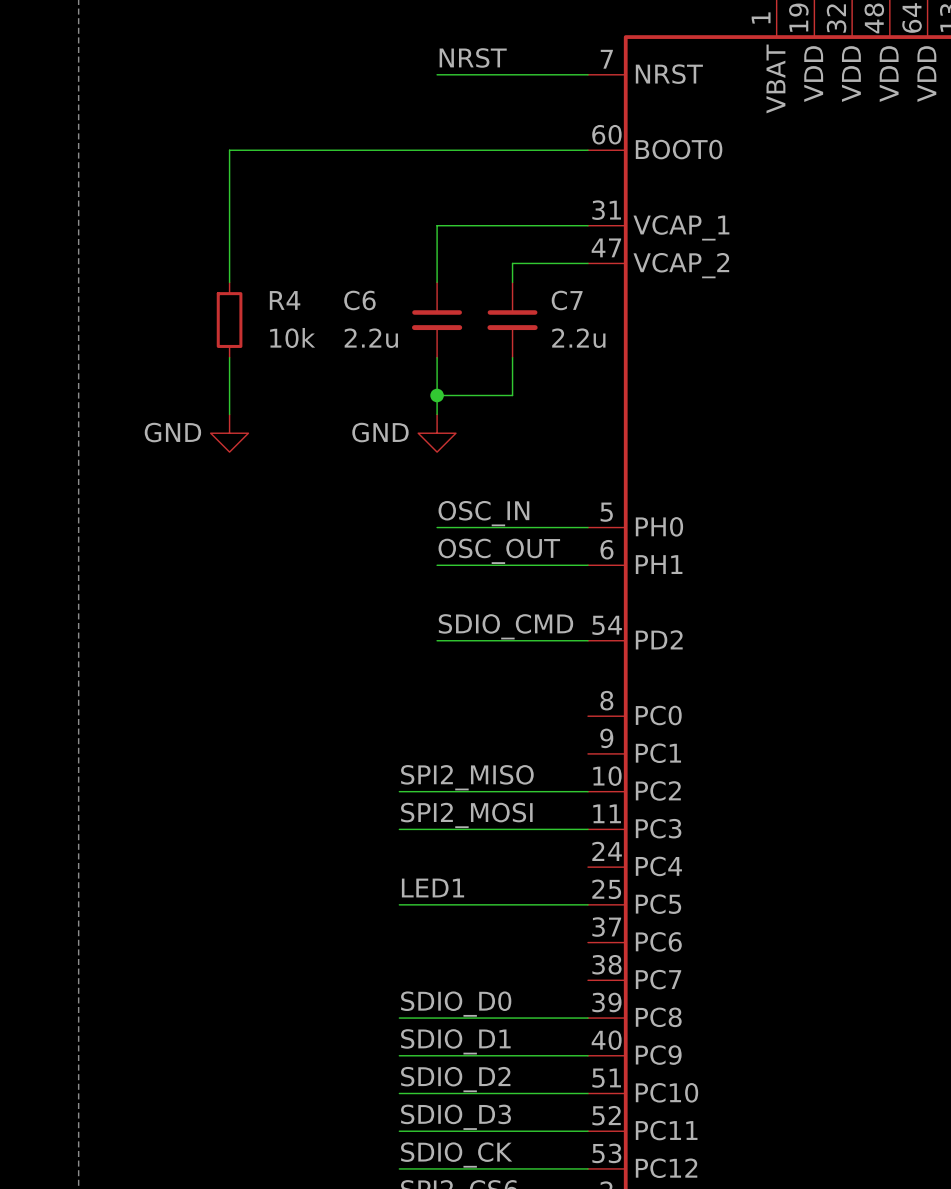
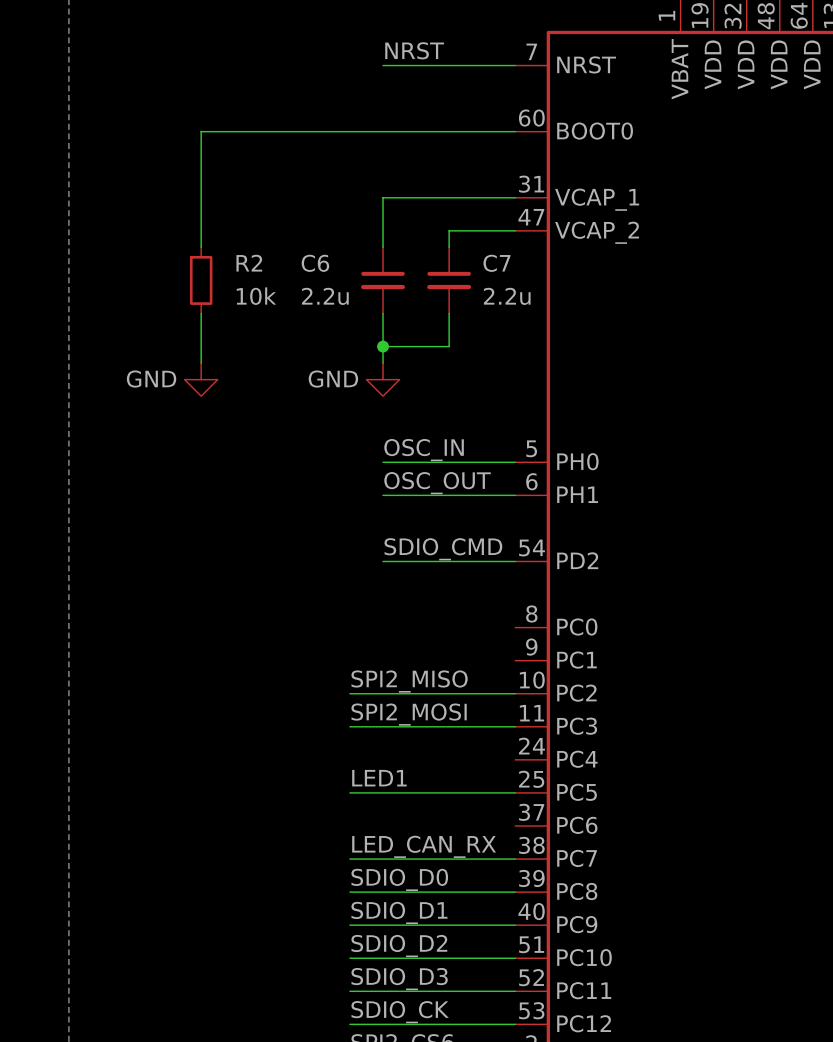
R4 name: R4 (285, 300) -> R2 (249, 263)
label: none -> LED_CAN_RX (424, 846)
wire: none -> (349, 859) (515, 859)

